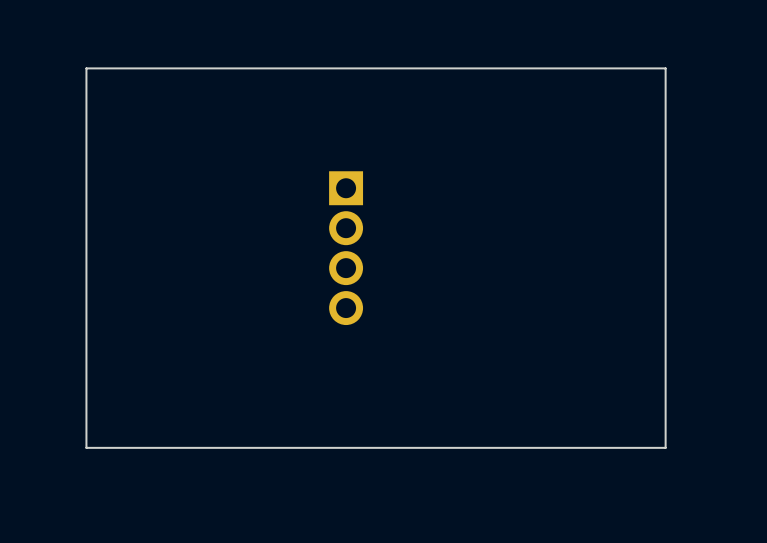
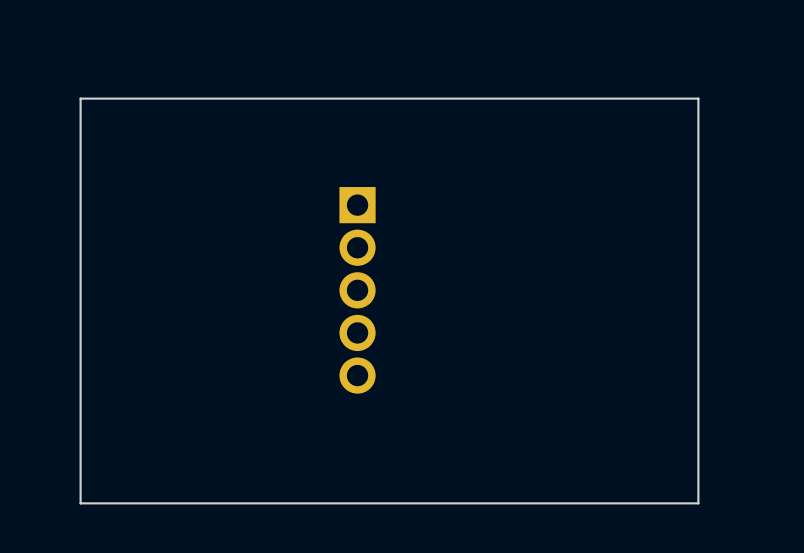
part footprint: [329, 171, 364, 326] -> [339, 187, 376, 394]

